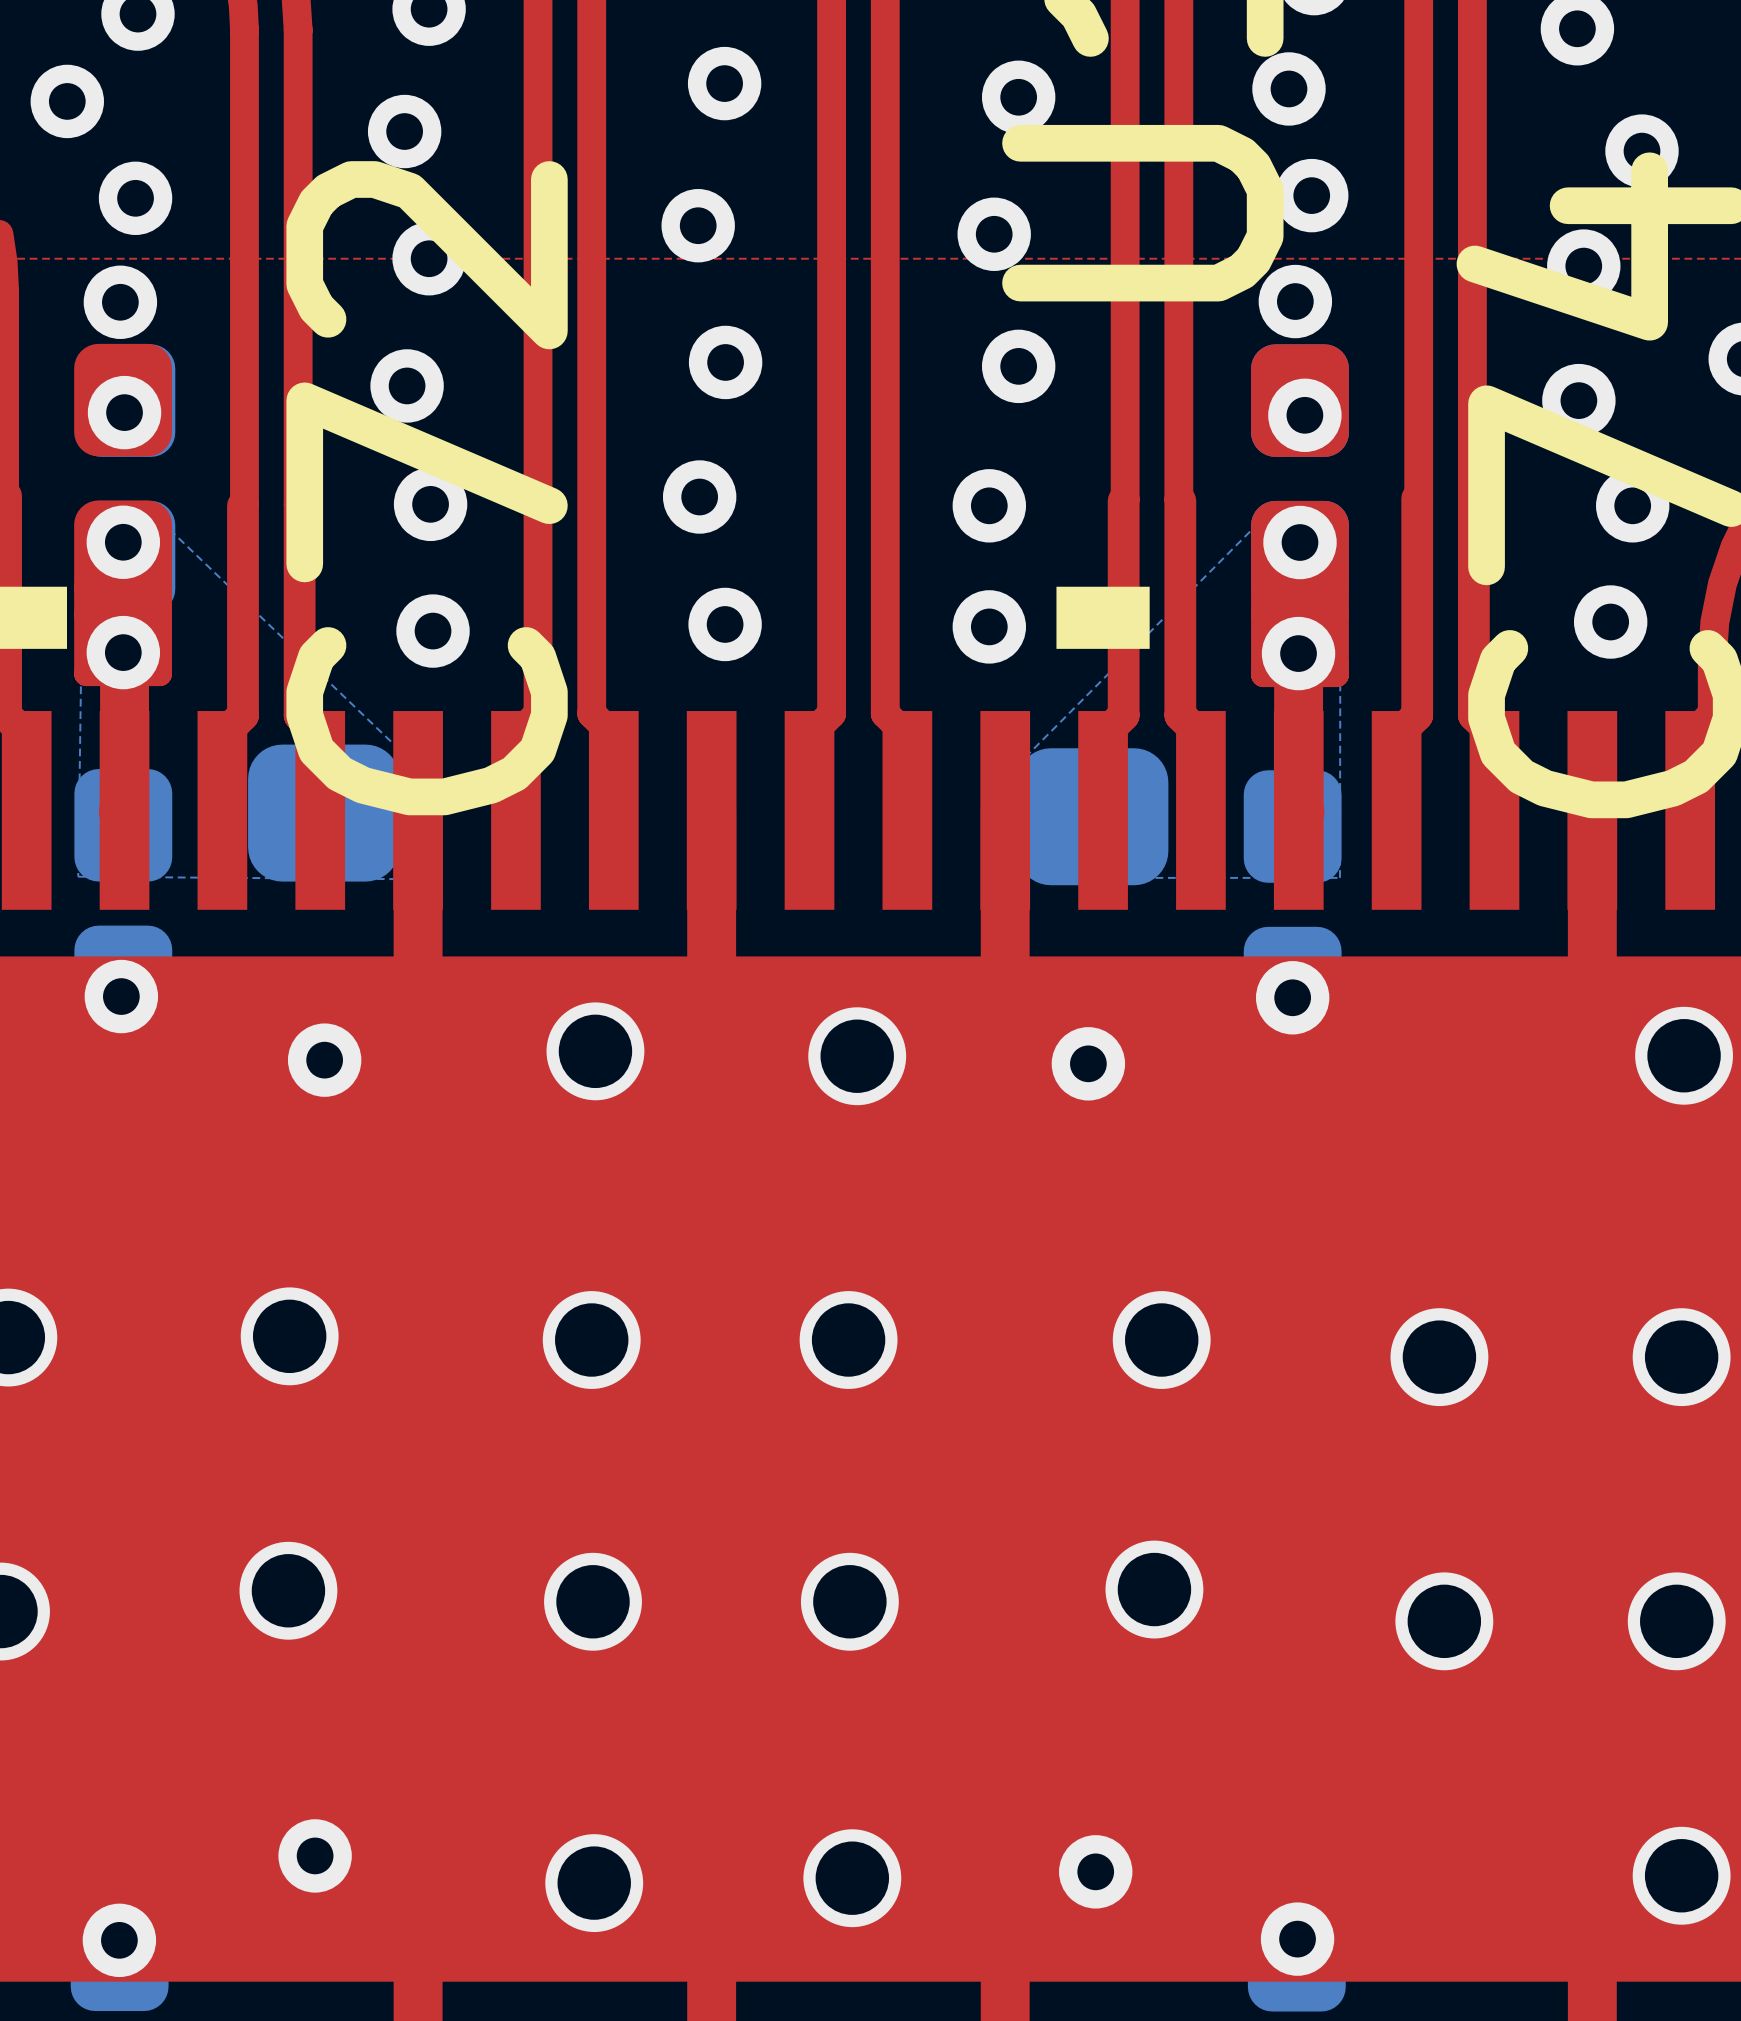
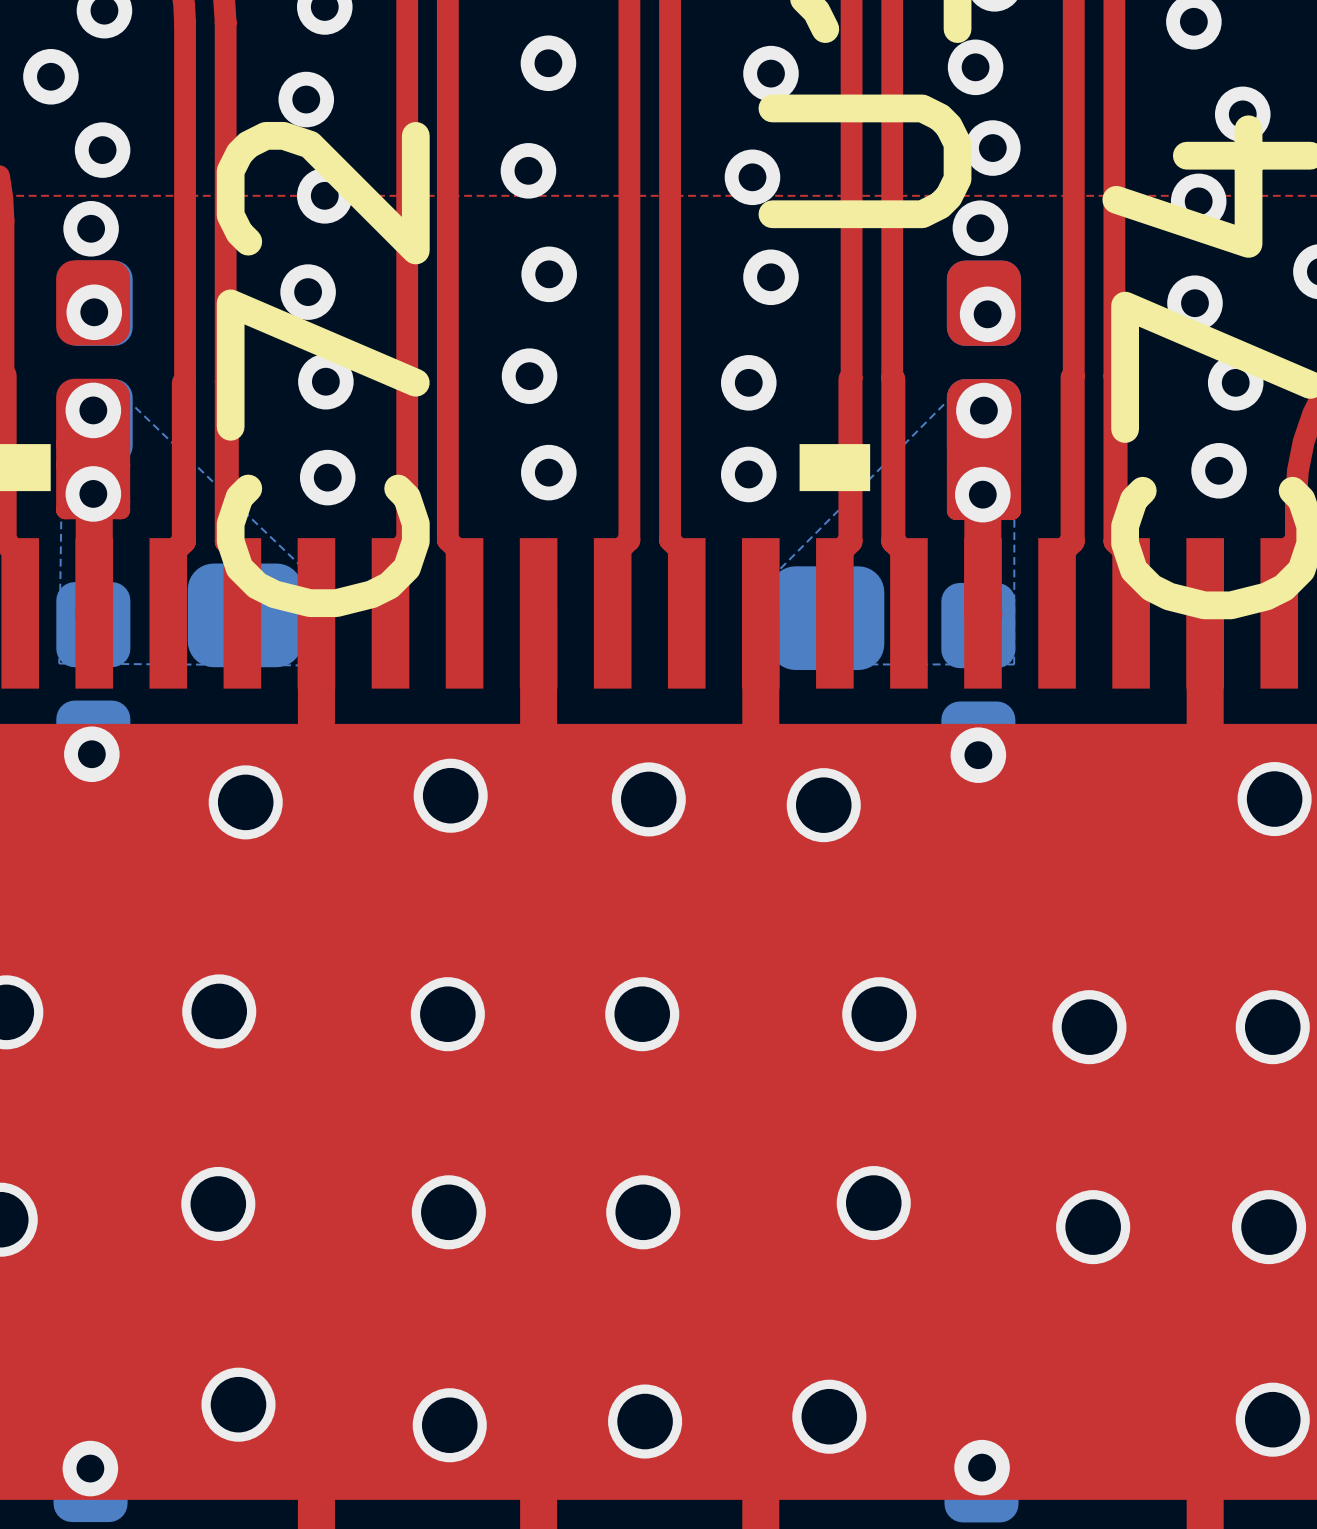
via size: [287, 1023, 362, 1097] -> [208, 765, 283, 840]
via size: [1051, 1027, 1126, 1101] -> [786, 768, 861, 843]
via size: [278, 1819, 352, 1893] -> [201, 1367, 276, 1442]
via size: [1059, 1835, 1133, 1909] -> [792, 1379, 867, 1454]

